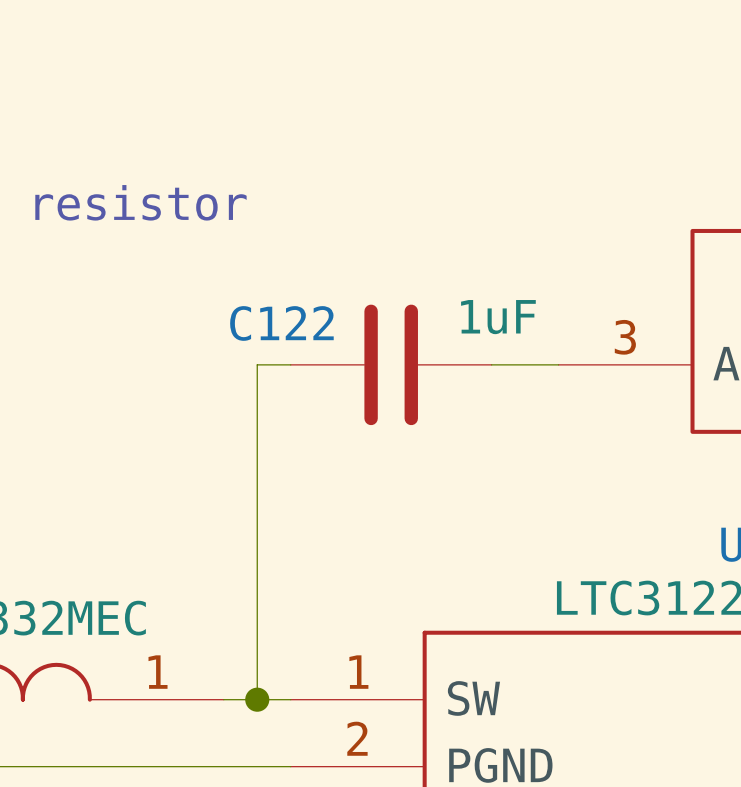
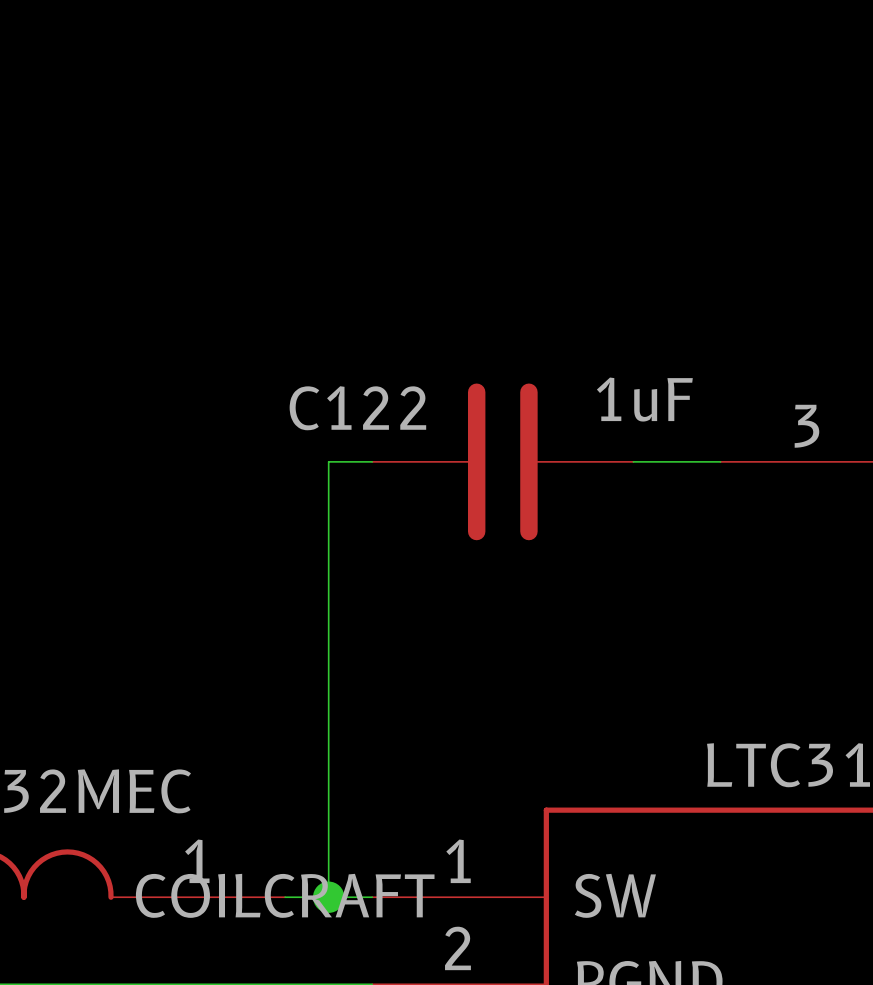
part text: none -> COILCRAFT (285, 895)

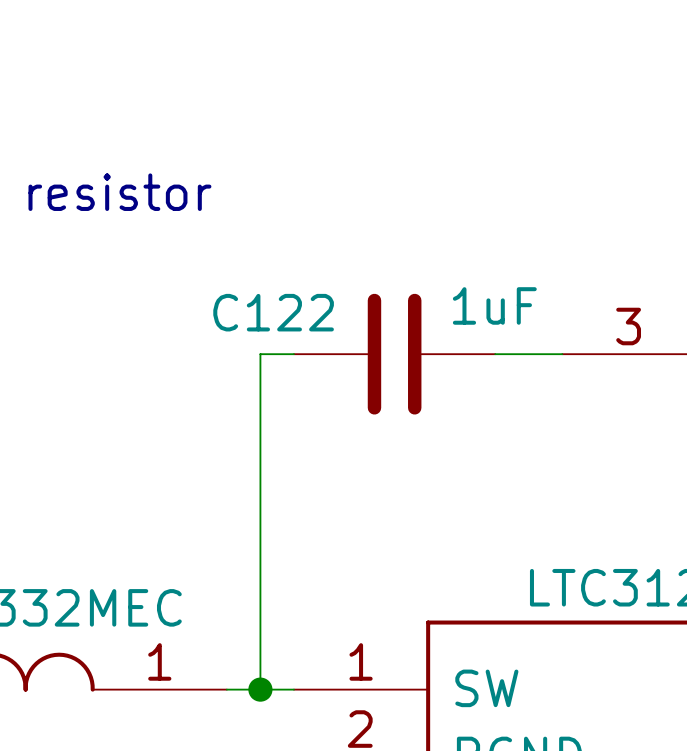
part text: COILCRAFT (285, 895) -> none

